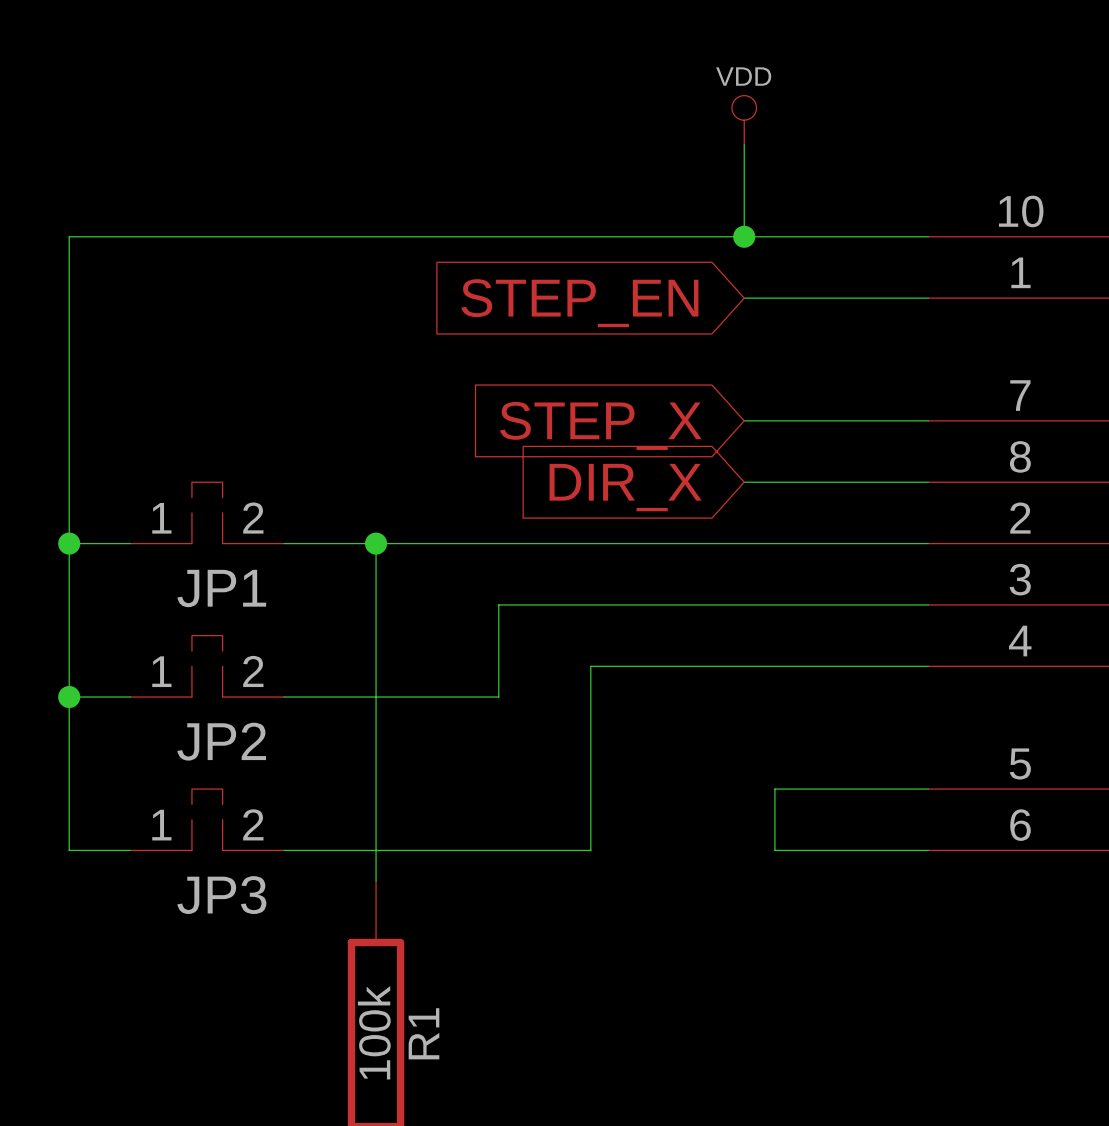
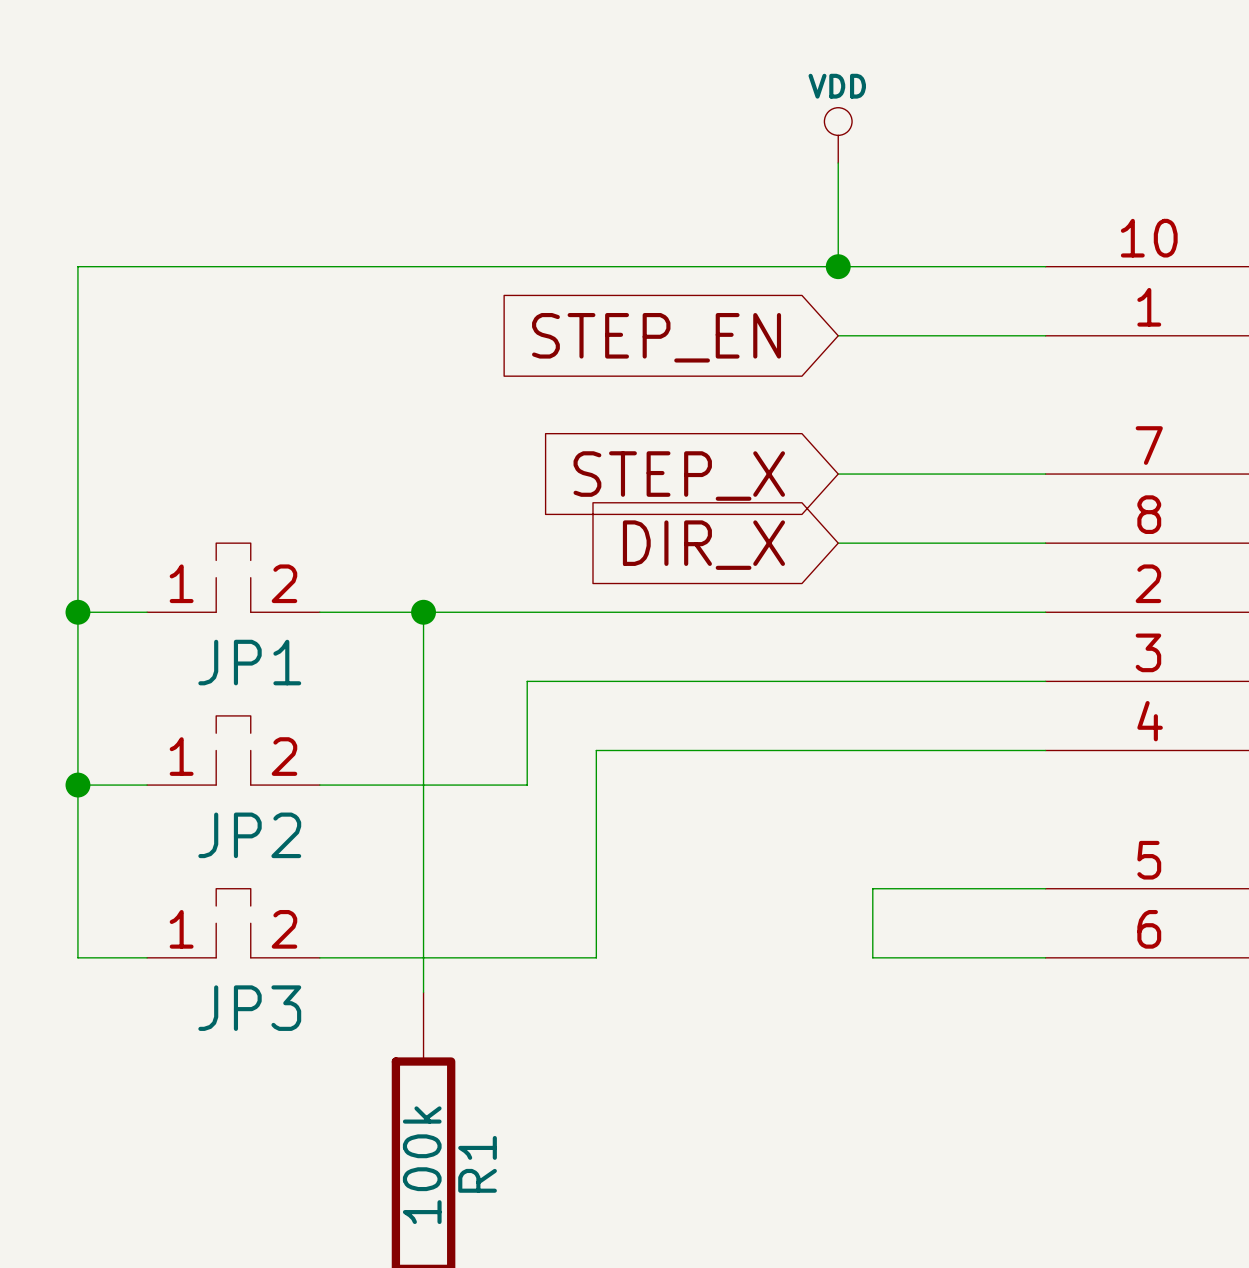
wire: (498, 604) (498, 697) (468, 697) -> (561, 681) (527, 681) (527, 785)
wire: (590, 666) (590, 850) (529, 850) -> (665, 750) (596, 750) (596, 957)

